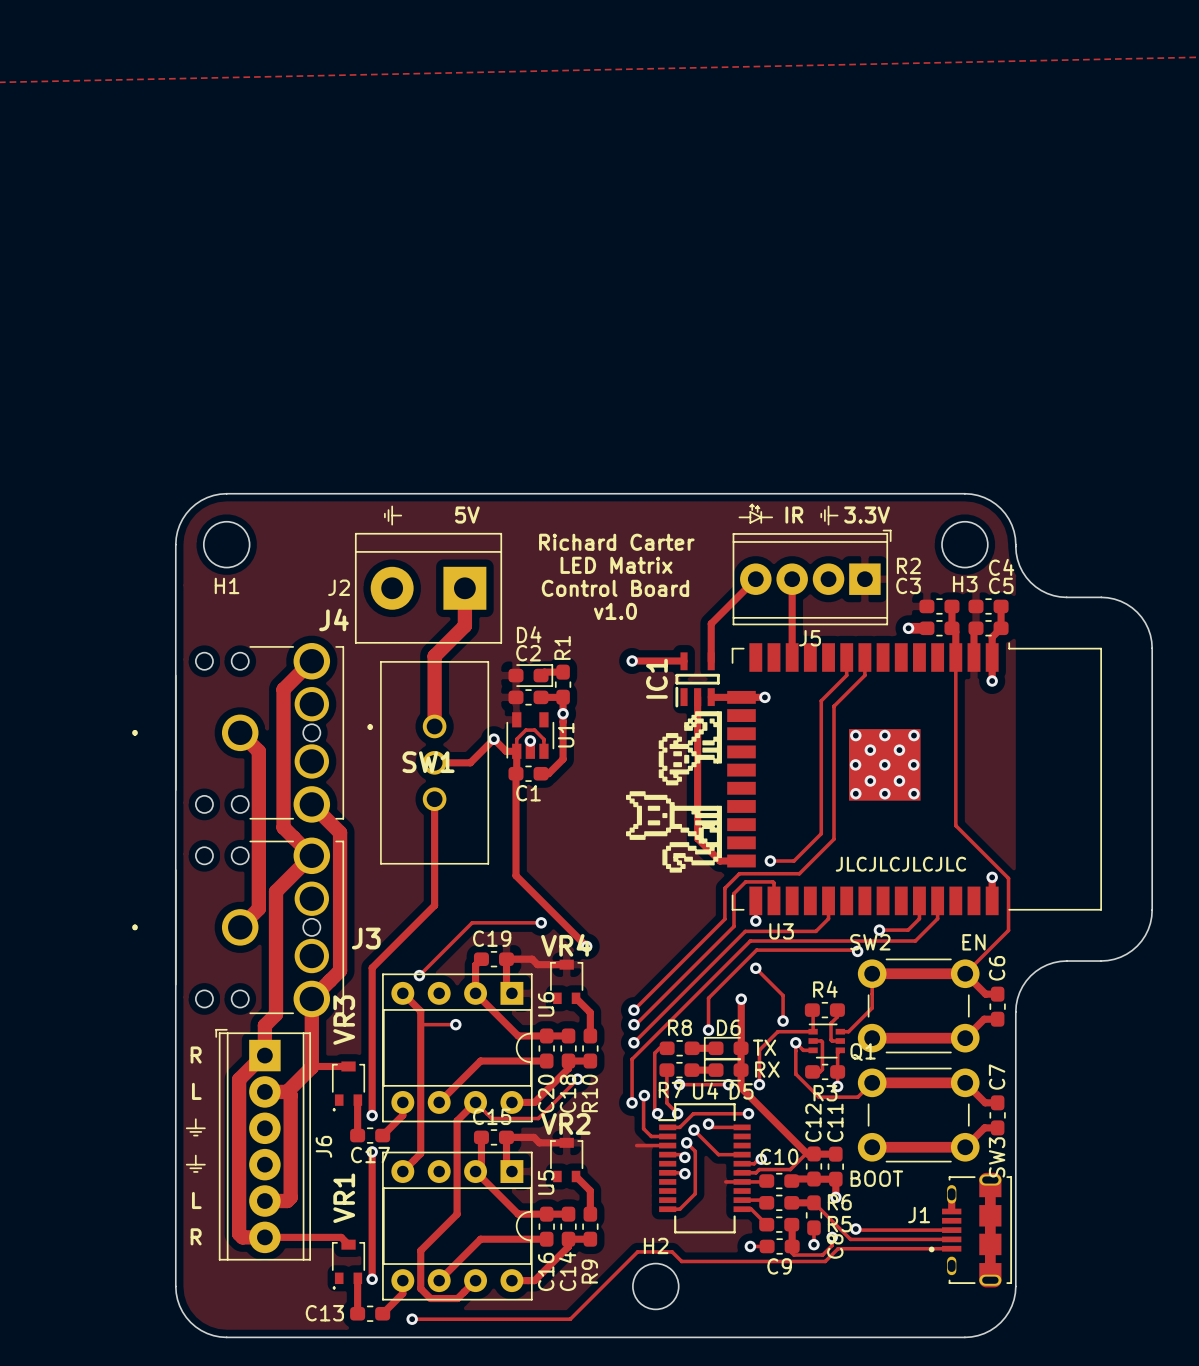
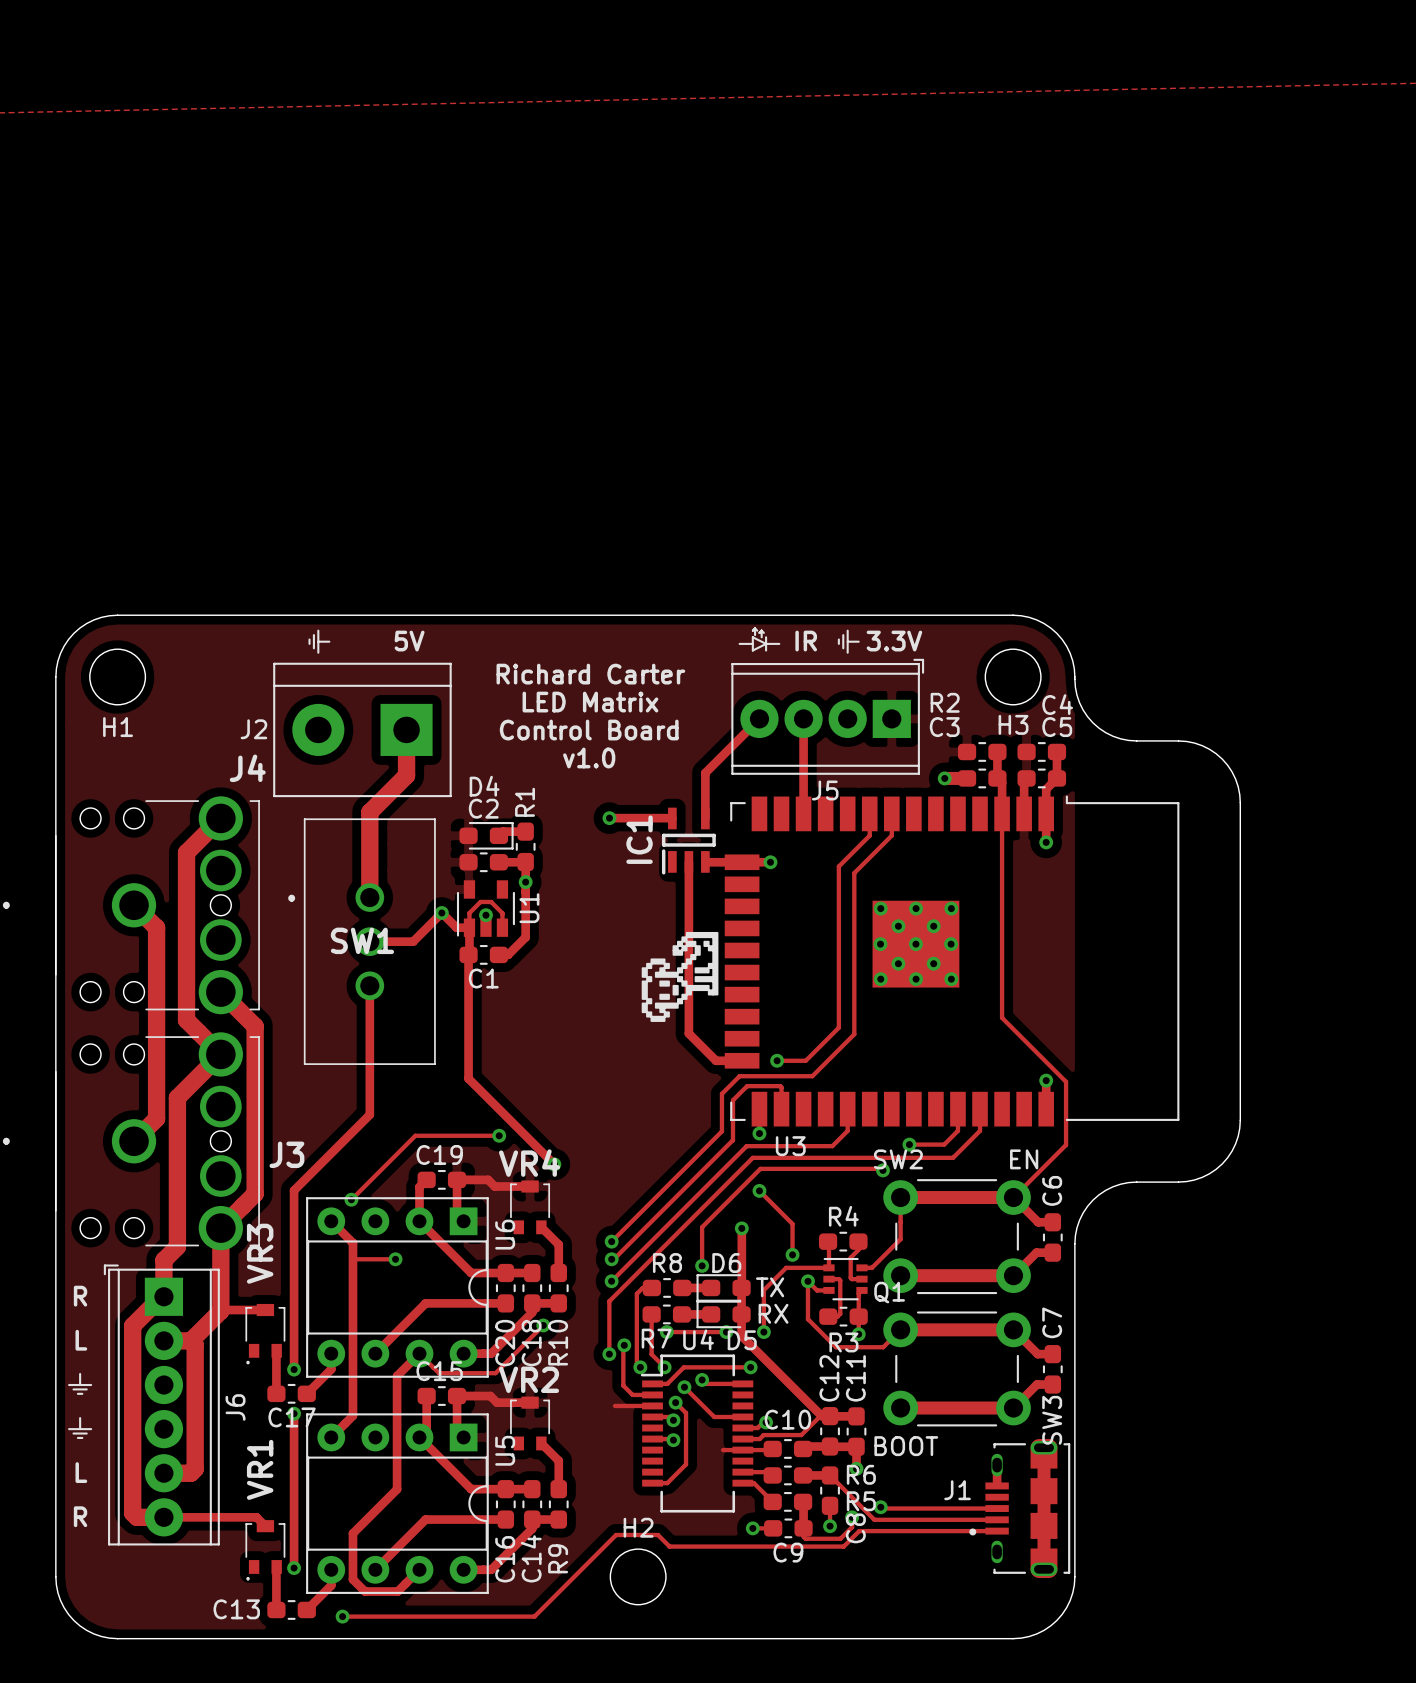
drawing position: (690, 748) -> (680, 976)
drawing: [626, 791, 722, 873] -> none
text: JLCJLCJLCJLC (900, 864) -> none

